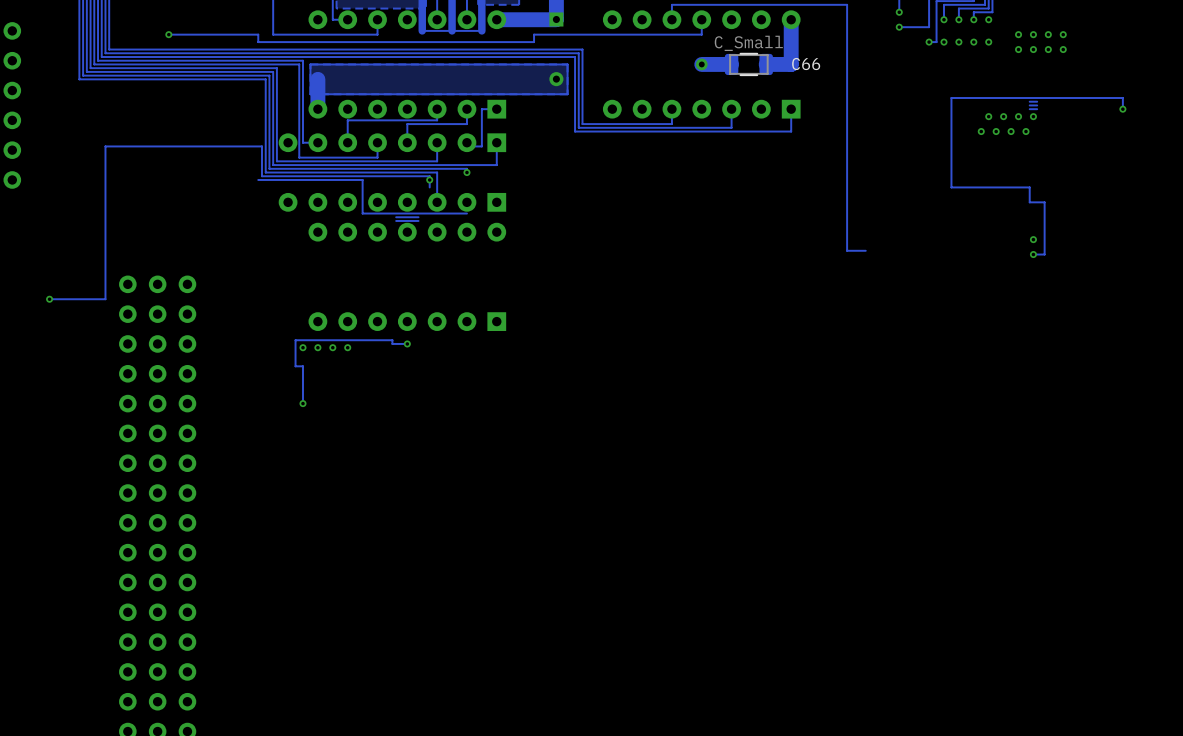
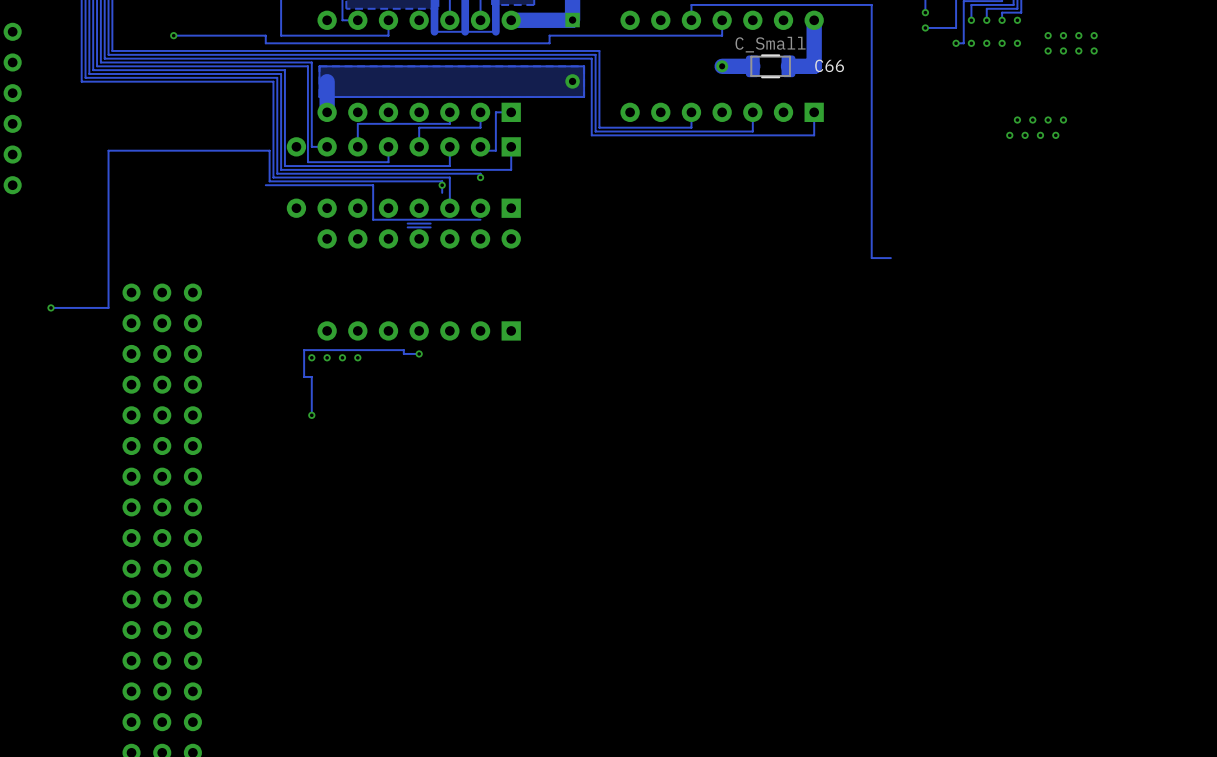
track: (1037, 101) (1029, 101) -> none
track: (1037, 105) (1029, 105) -> none
track: (1037, 109) (1029, 109) -> none
track: (1122, 109) (1122, 97) (951, 97) (951, 187) (1029, 187) (1029, 202) (1044, 202) (1044, 254) (1033, 254) -> none
via: (1122, 109) -> none
via: (1033, 239) -> none
via: (1033, 254) -> none

